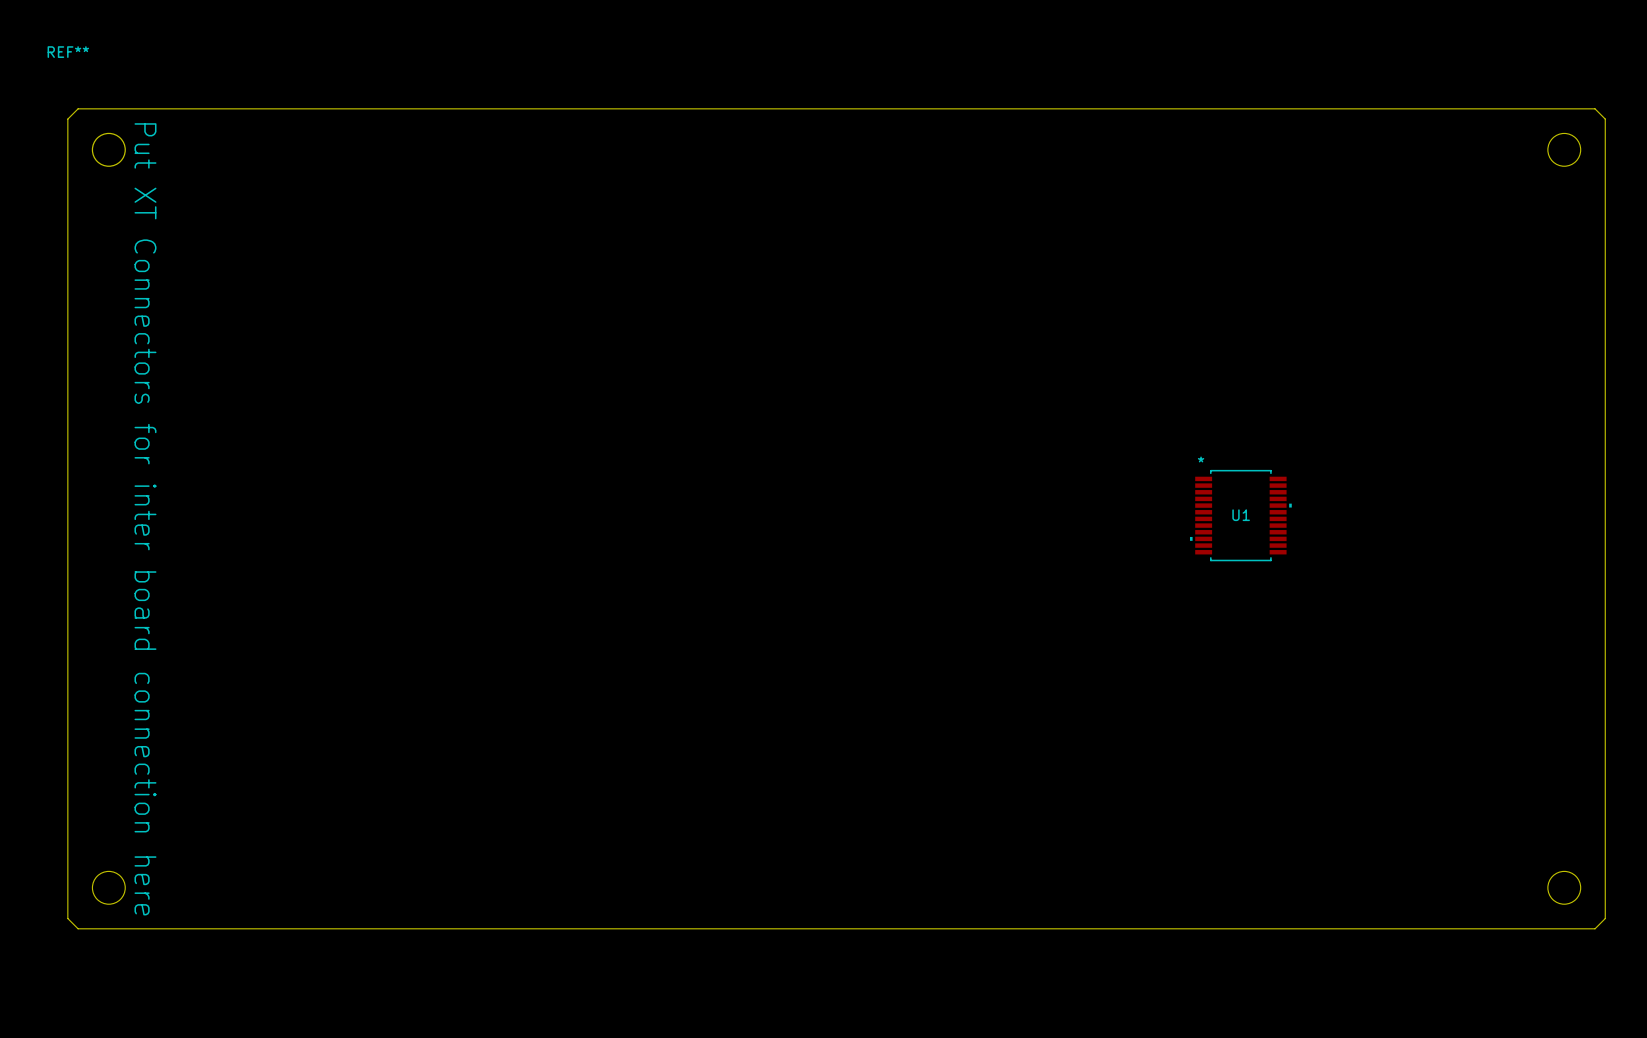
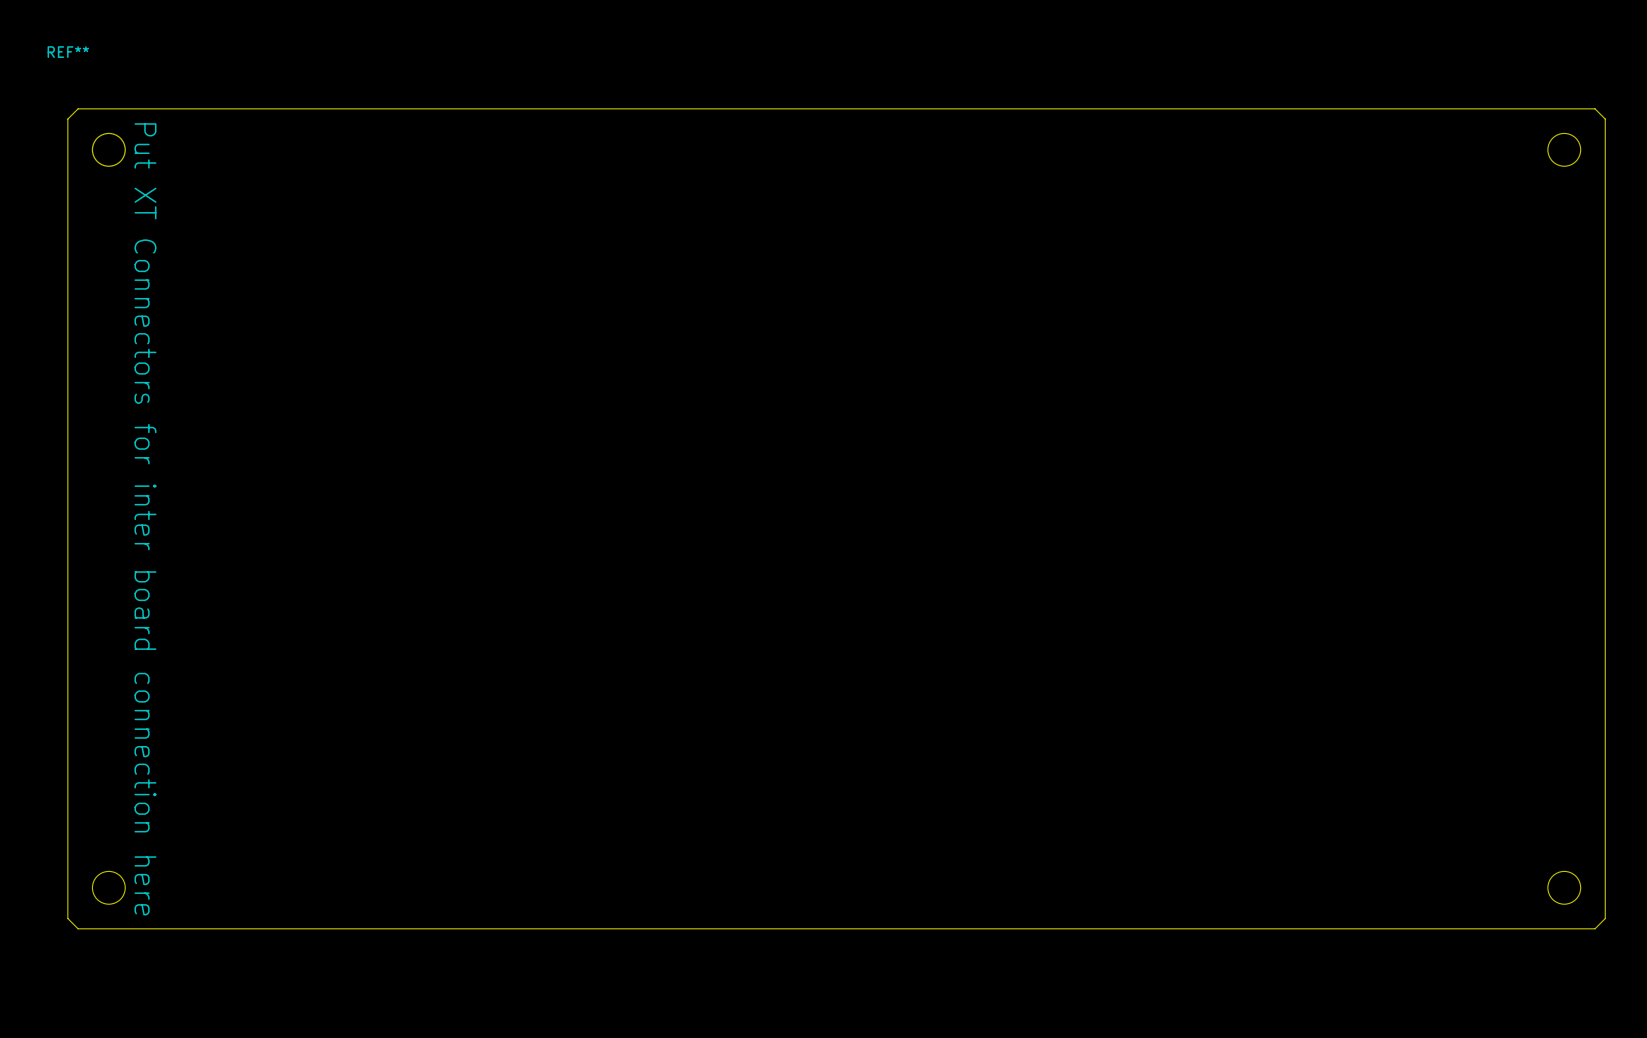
U1: (1240, 515) -> none

